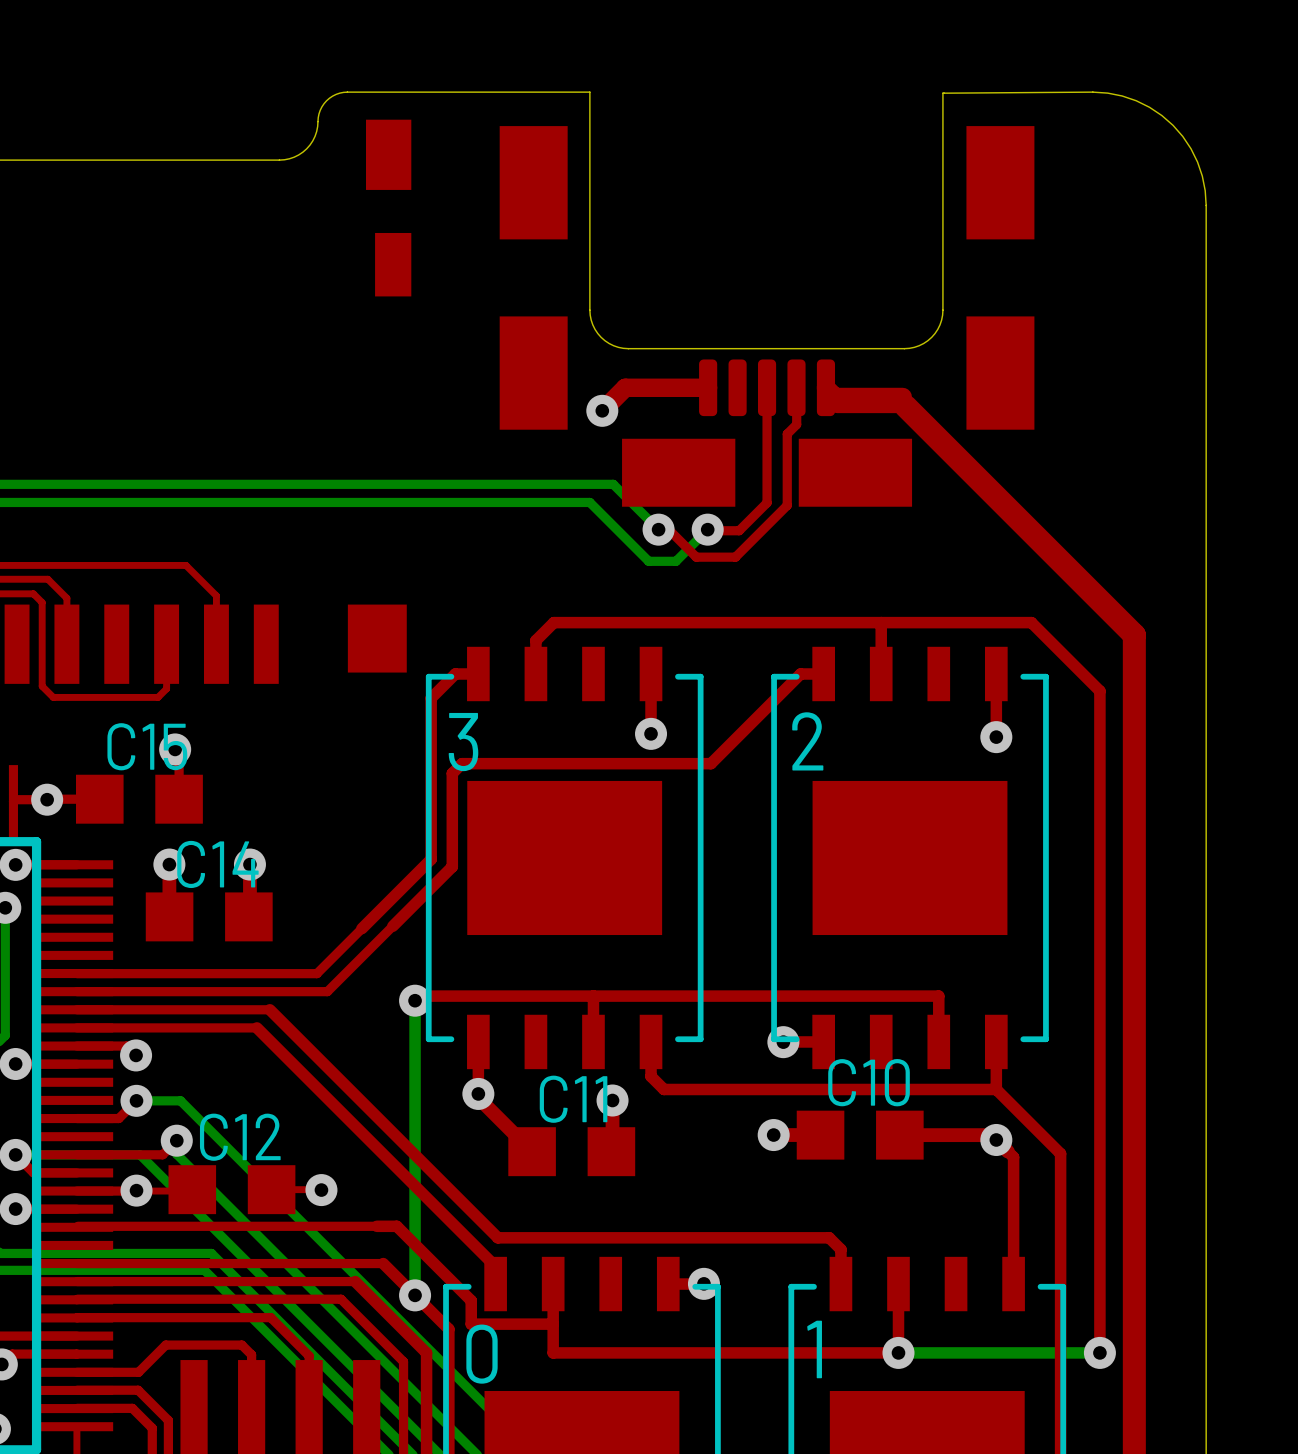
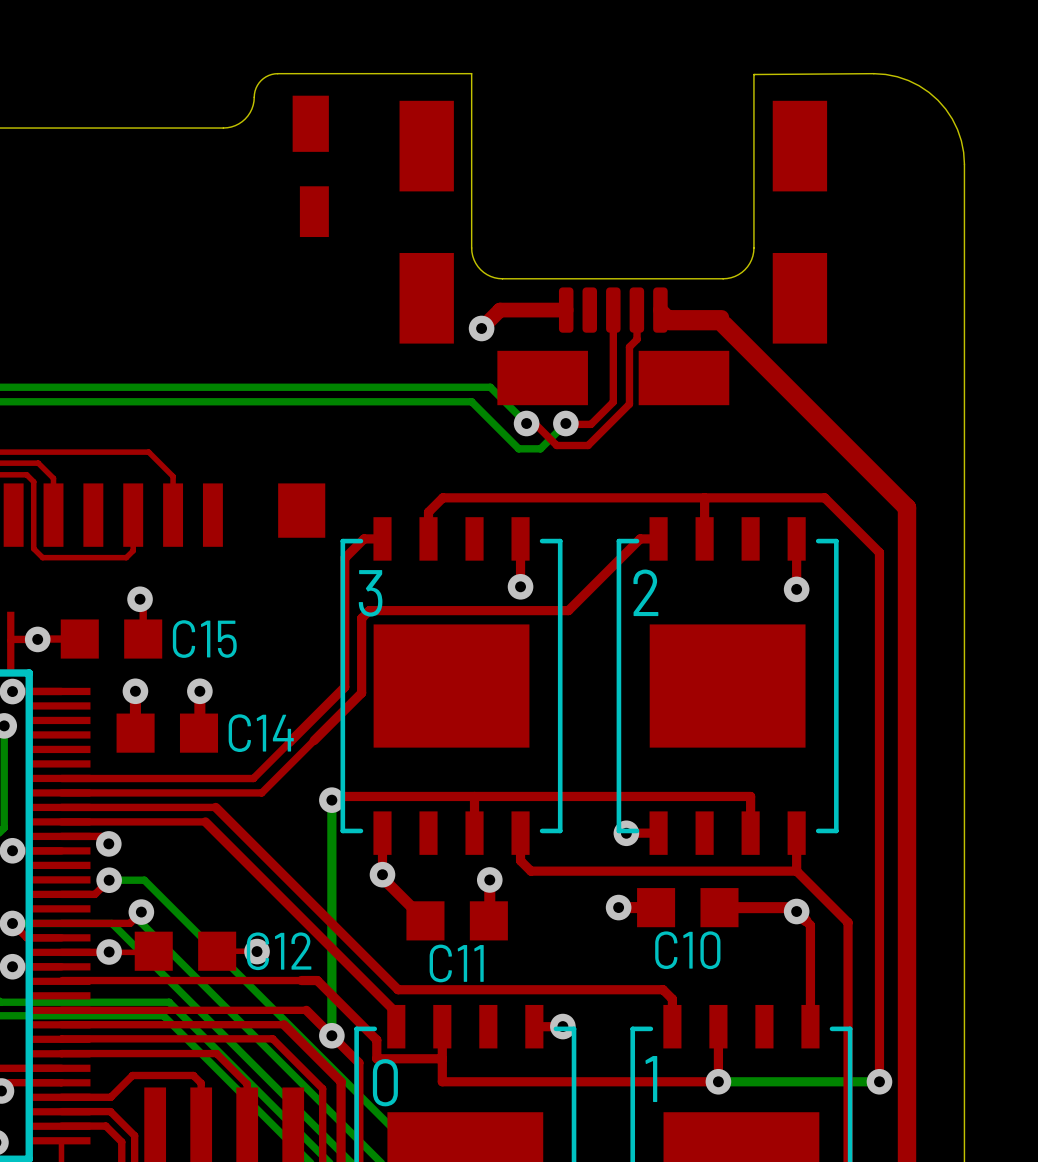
C15 name position: C15 (147, 746) -> C15 (204, 639)
C14 name position: C14 (217, 864) -> C14 (261, 733)
C10 name position: C10 (869, 1082) -> C10 (687, 950)
C11 name position: C11 (573, 1099) -> C11 (456, 963)
C12 name position: C12 (240, 1137) -> C12 (279, 951)

